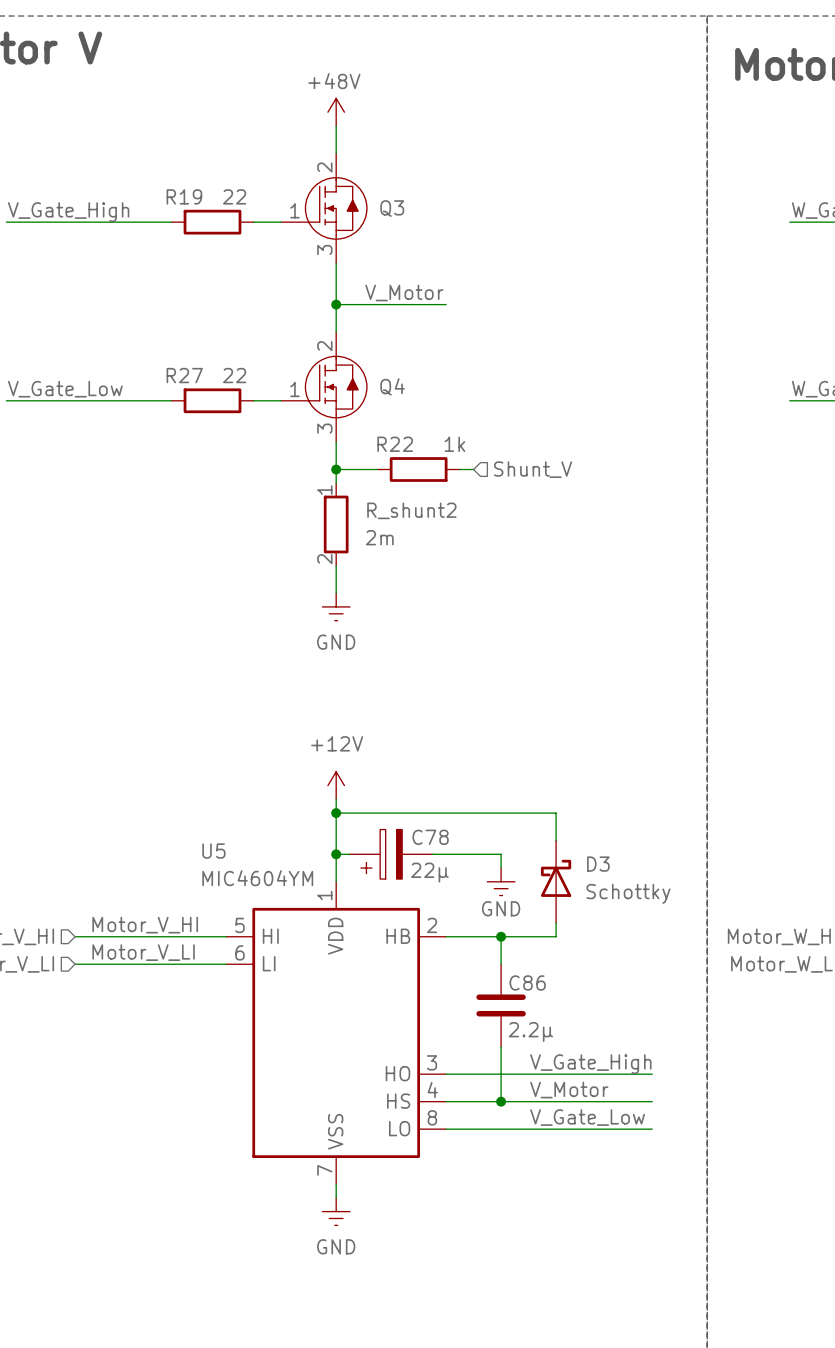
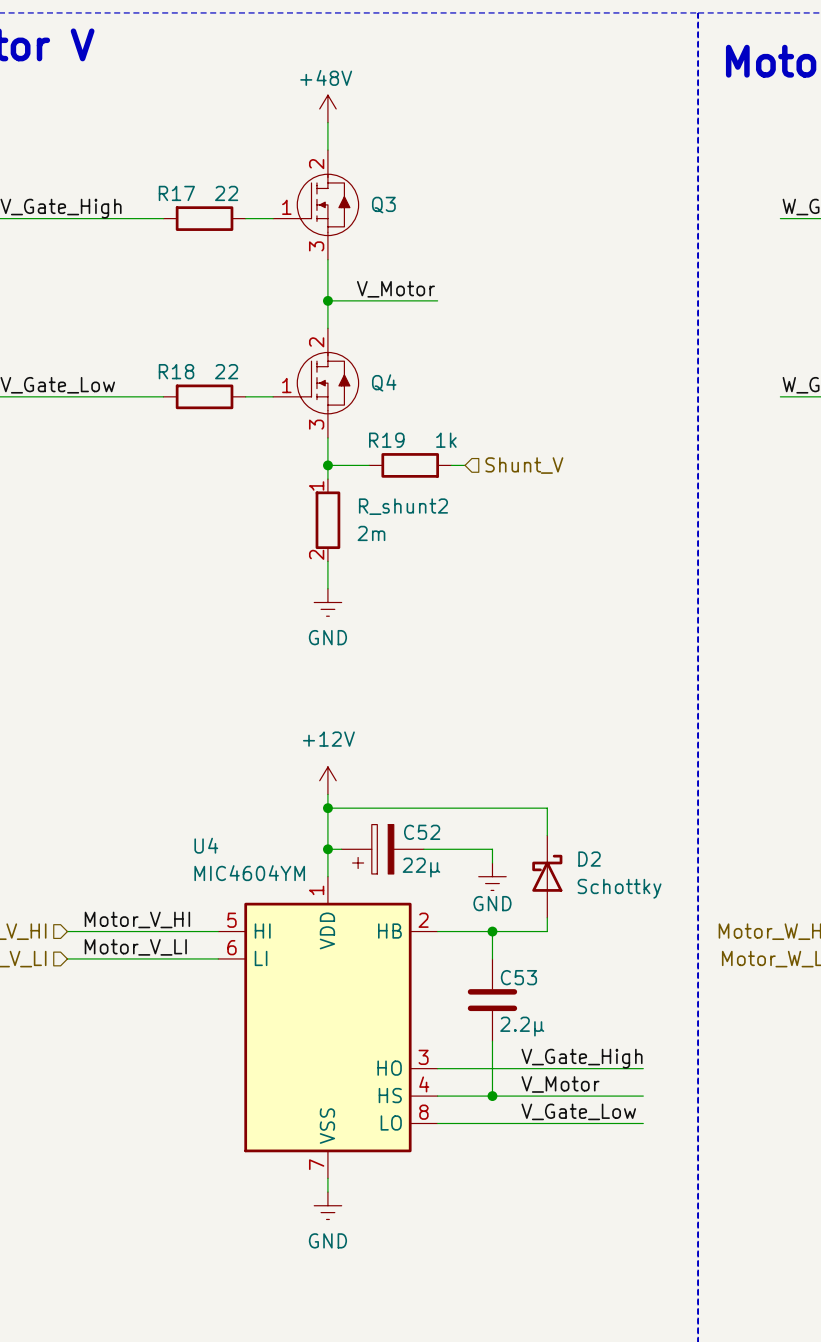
R19 name: R19 (184, 196) -> R17 (176, 193)
R27 name: R27 (184, 375) -> R18 (176, 371)
R22 name: R22 (395, 444) -> R19 (386, 440)
C78 name: C78 (430, 837) -> C52 (422, 832)
U5 name: U5 (213, 851) -> U4 (206, 845)
D3 name: D3 (598, 864) -> D2 (589, 859)
C86 name: C86 (527, 982) -> C53 (518, 977)

